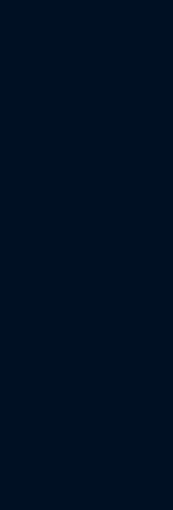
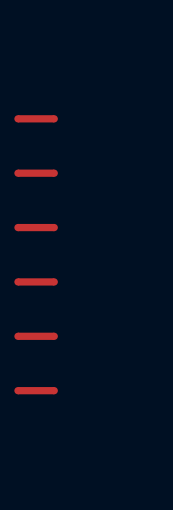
part: none -> (36, 118)
part: none -> (36, 173)
part: none -> (36, 227)
part: none -> (36, 281)
part: none -> (36, 336)
part: none -> (36, 390)

